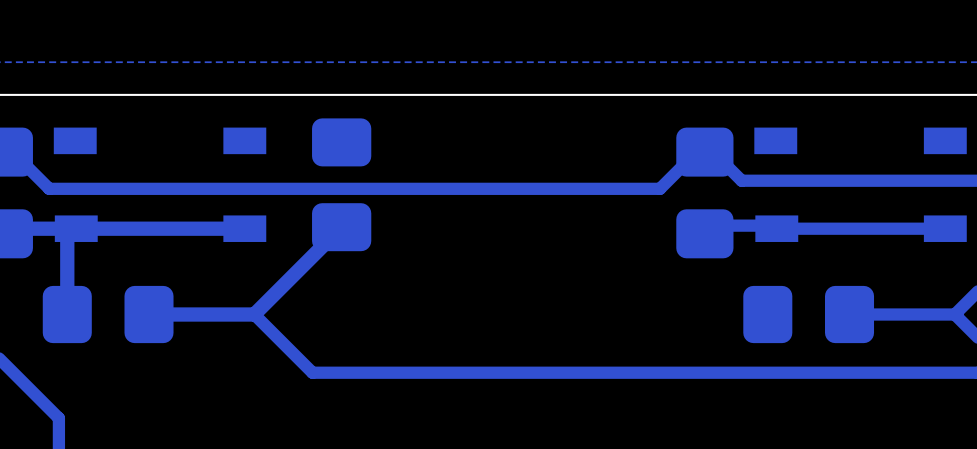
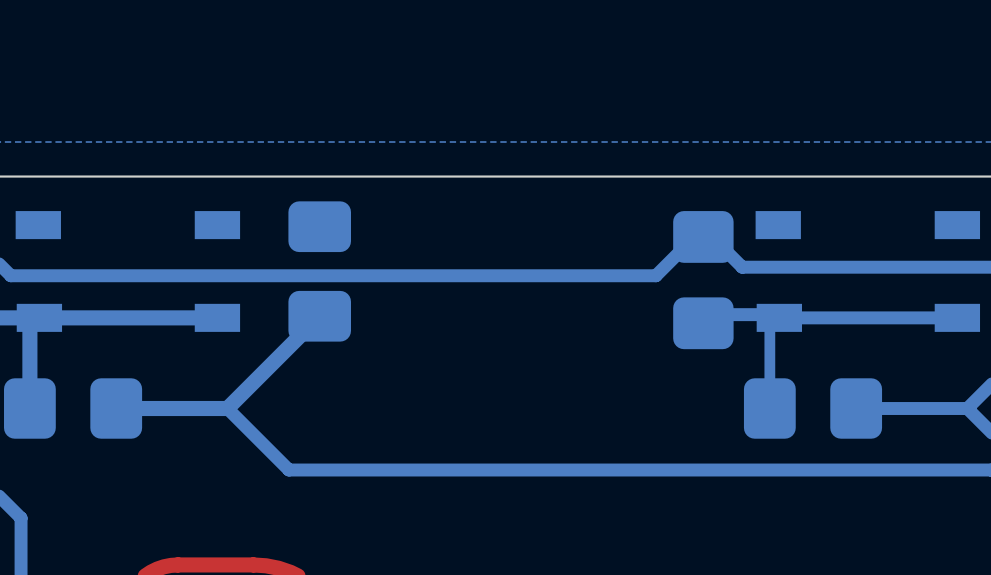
bottom track: none -> (779, 317) (769, 327) (769, 408)

